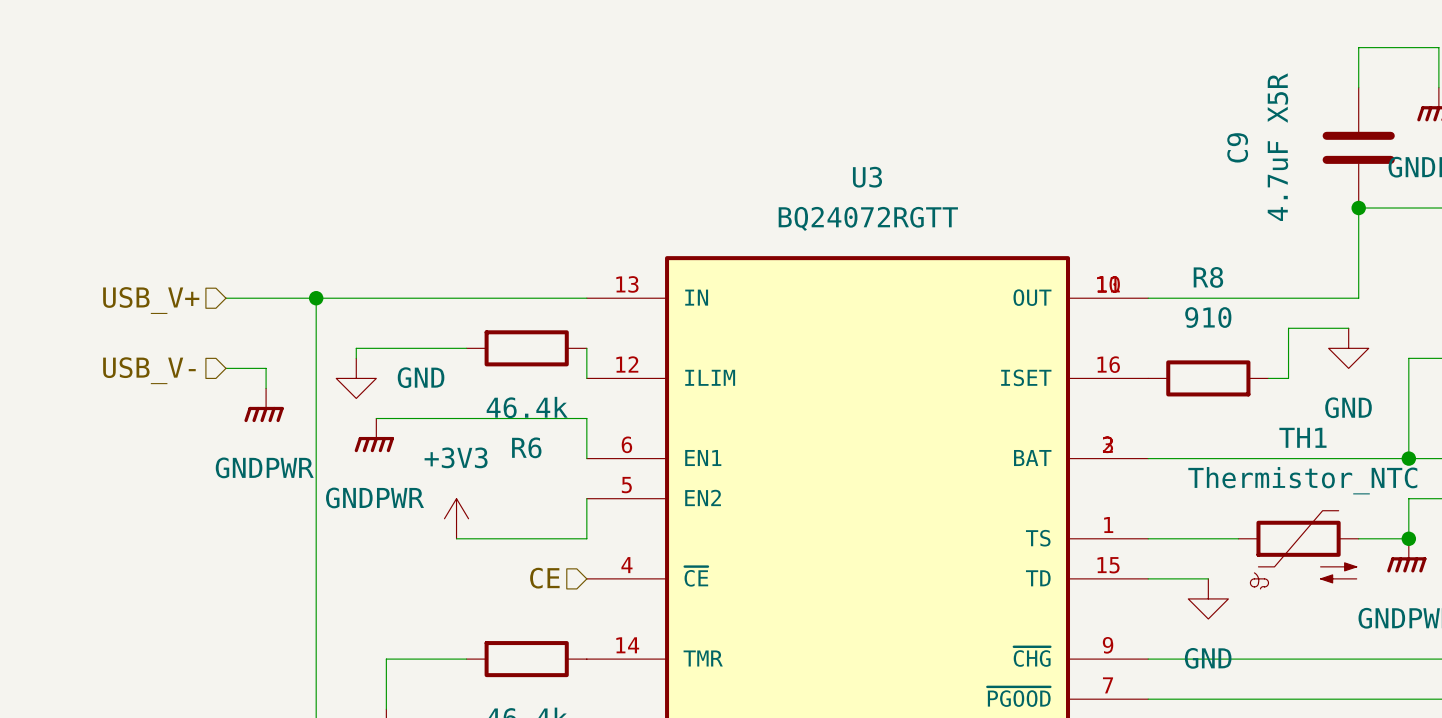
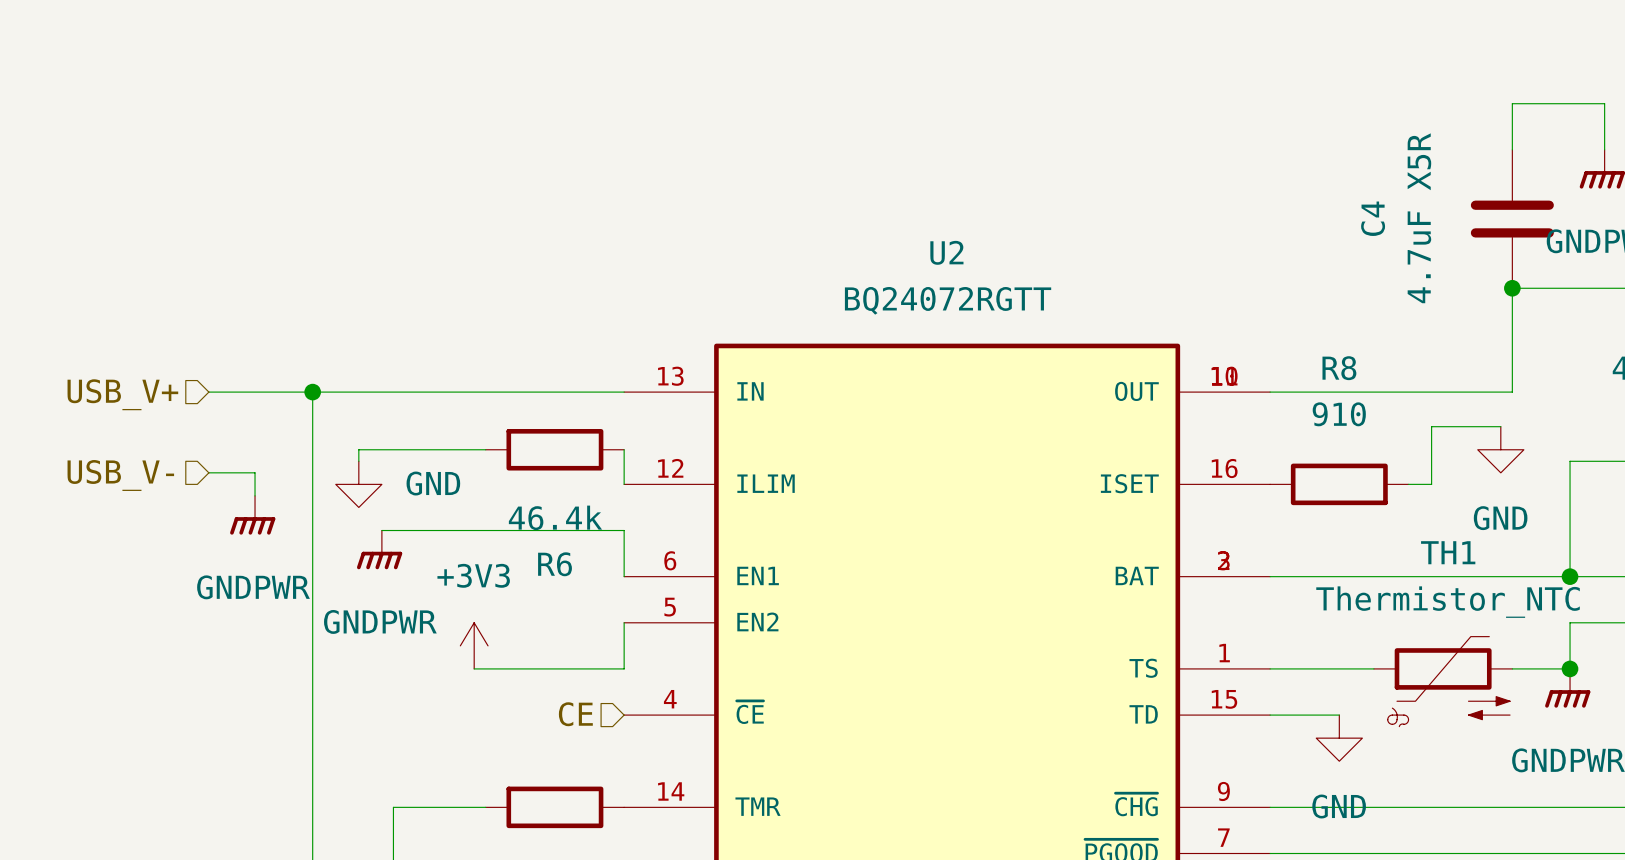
C9 name: C9 (1237, 147) -> C4 (1373, 218)
U3 name: U3 (867, 177) -> U2 (946, 252)

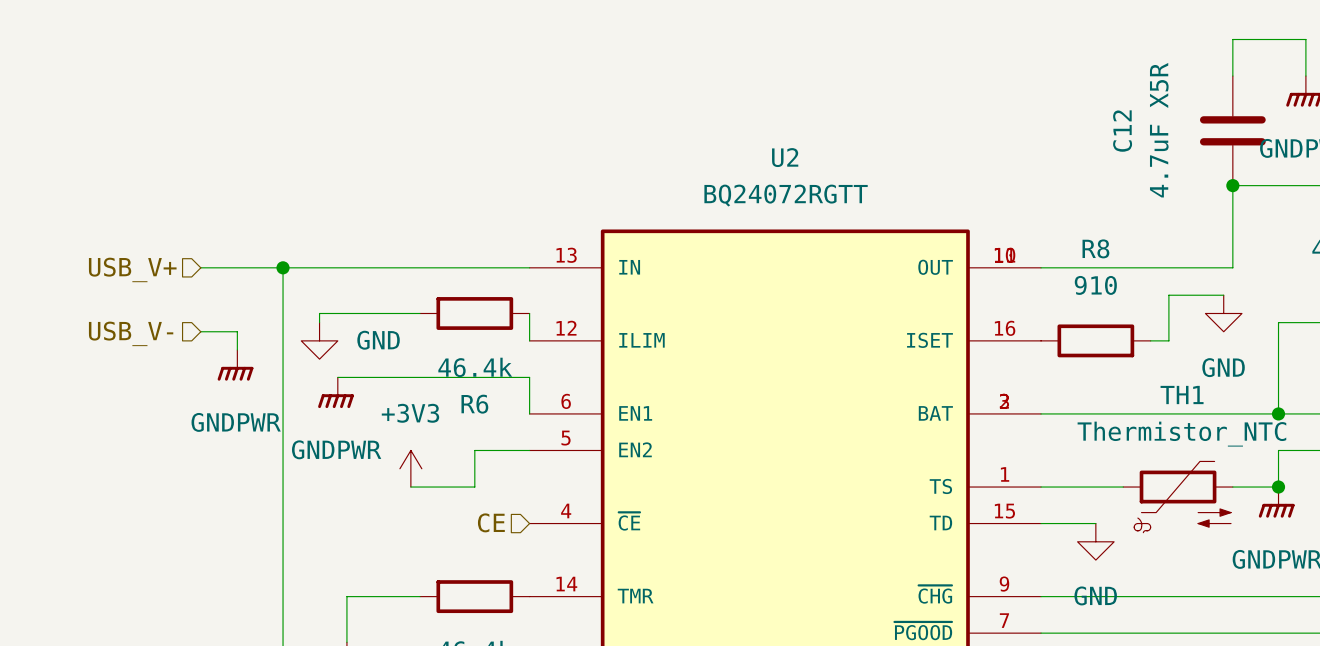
C4 name: C4 (1373, 218) -> C12 (1122, 131)
wire: (624, 622) (624, 668) (554, 668) -> (529, 450) (474, 450) (474, 487)

